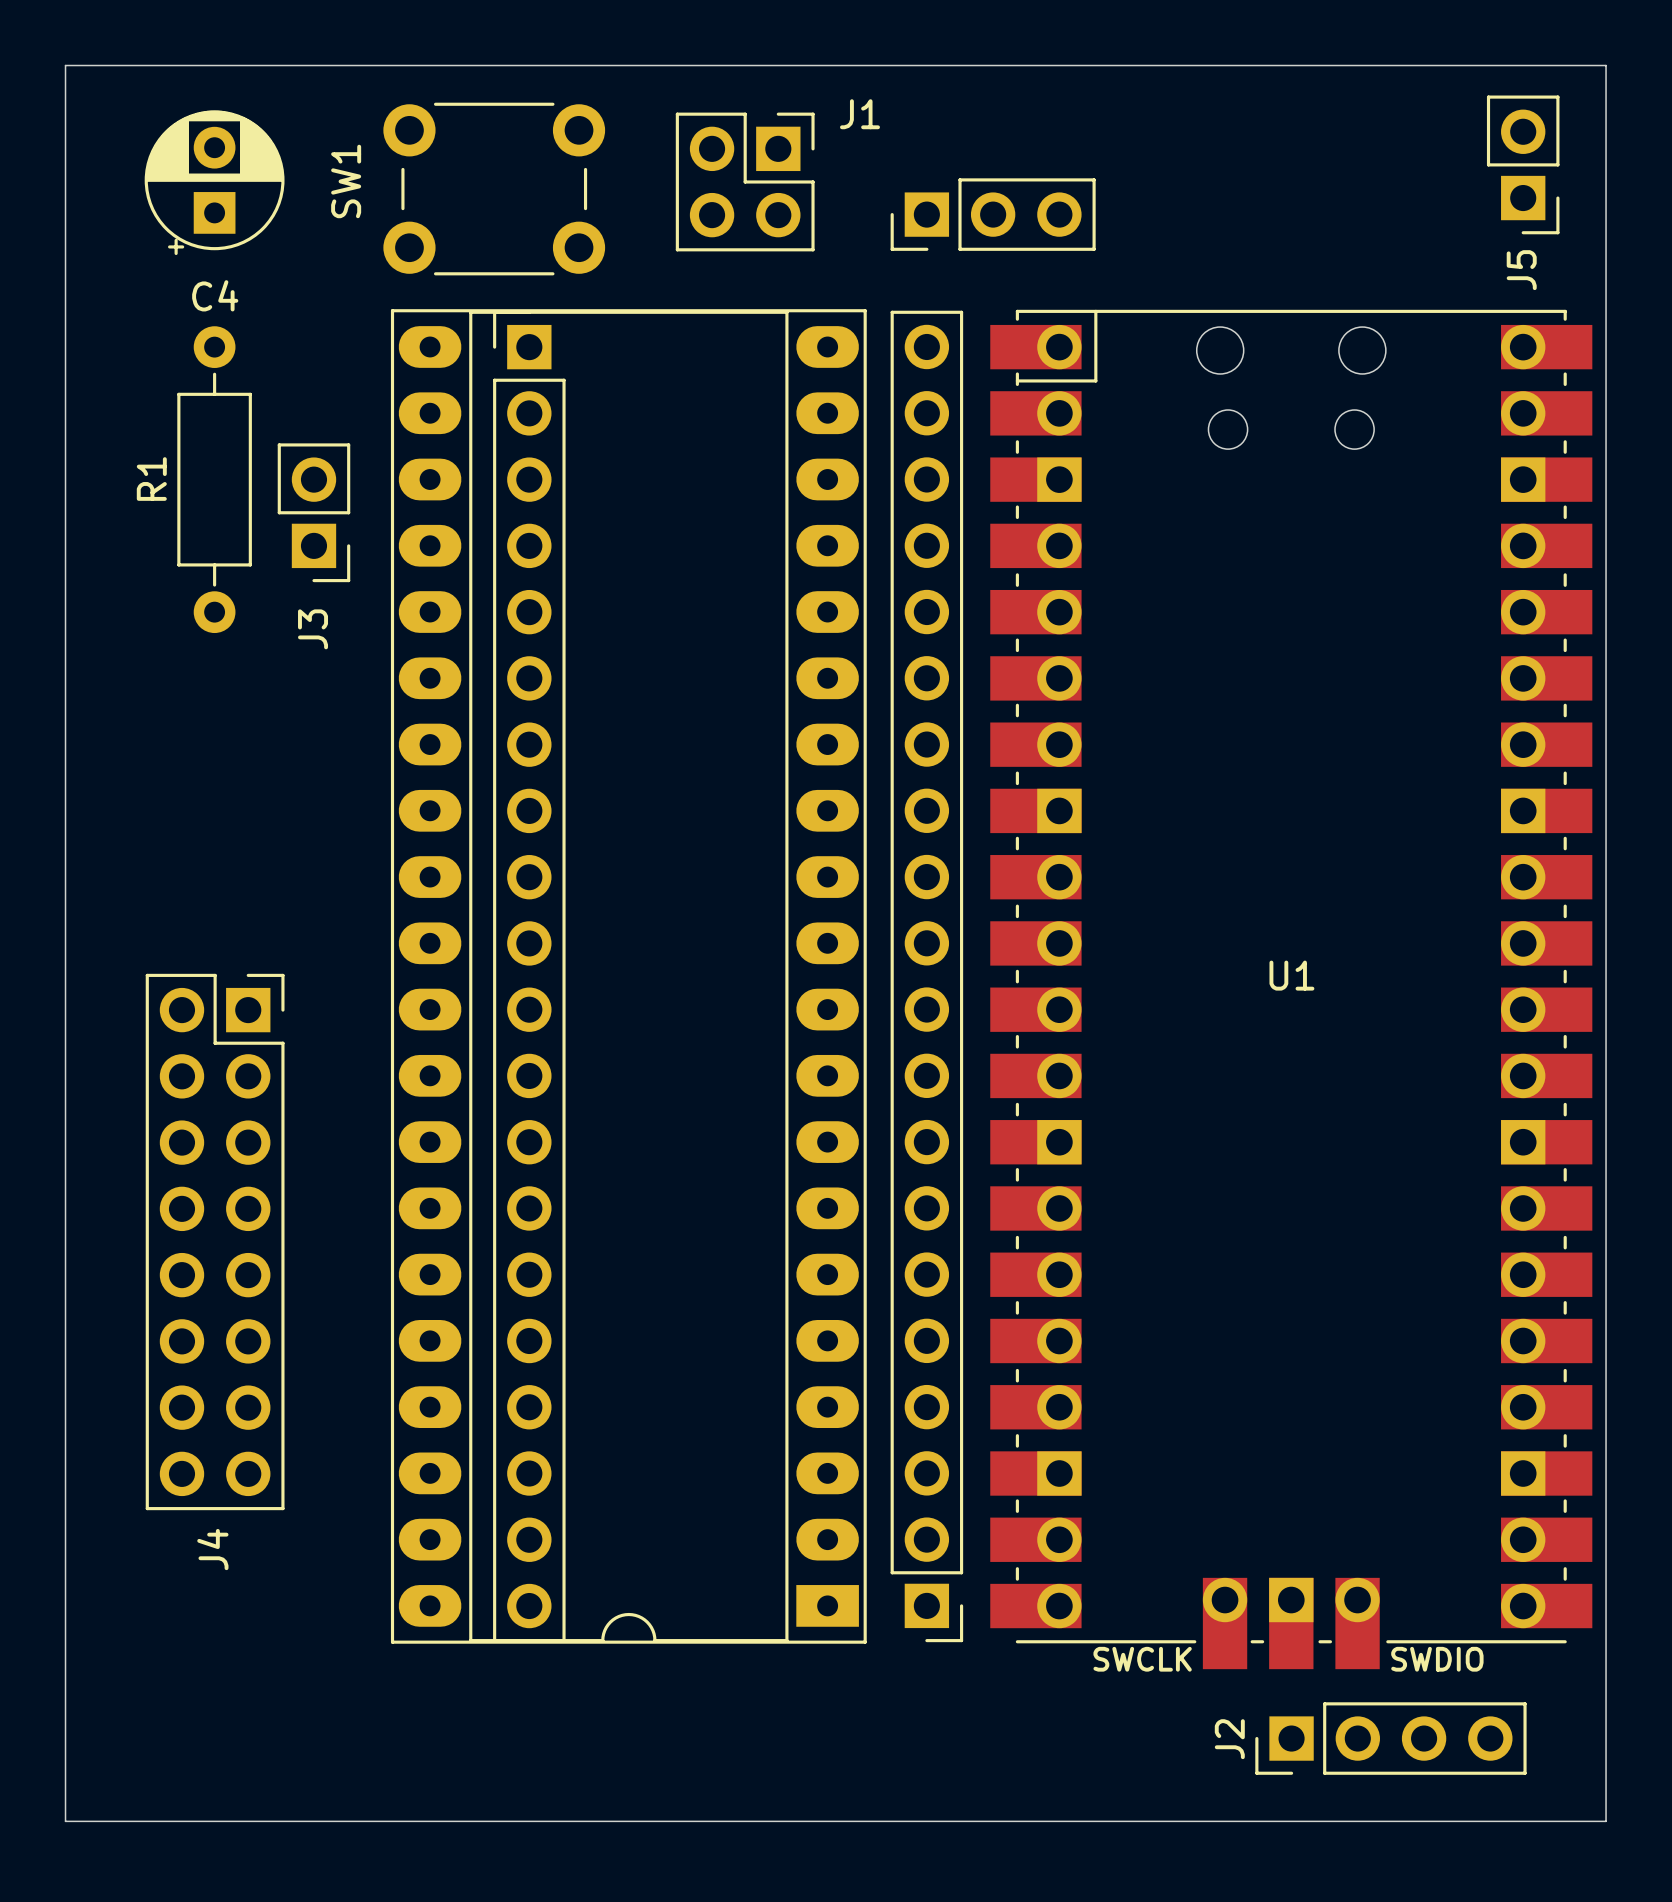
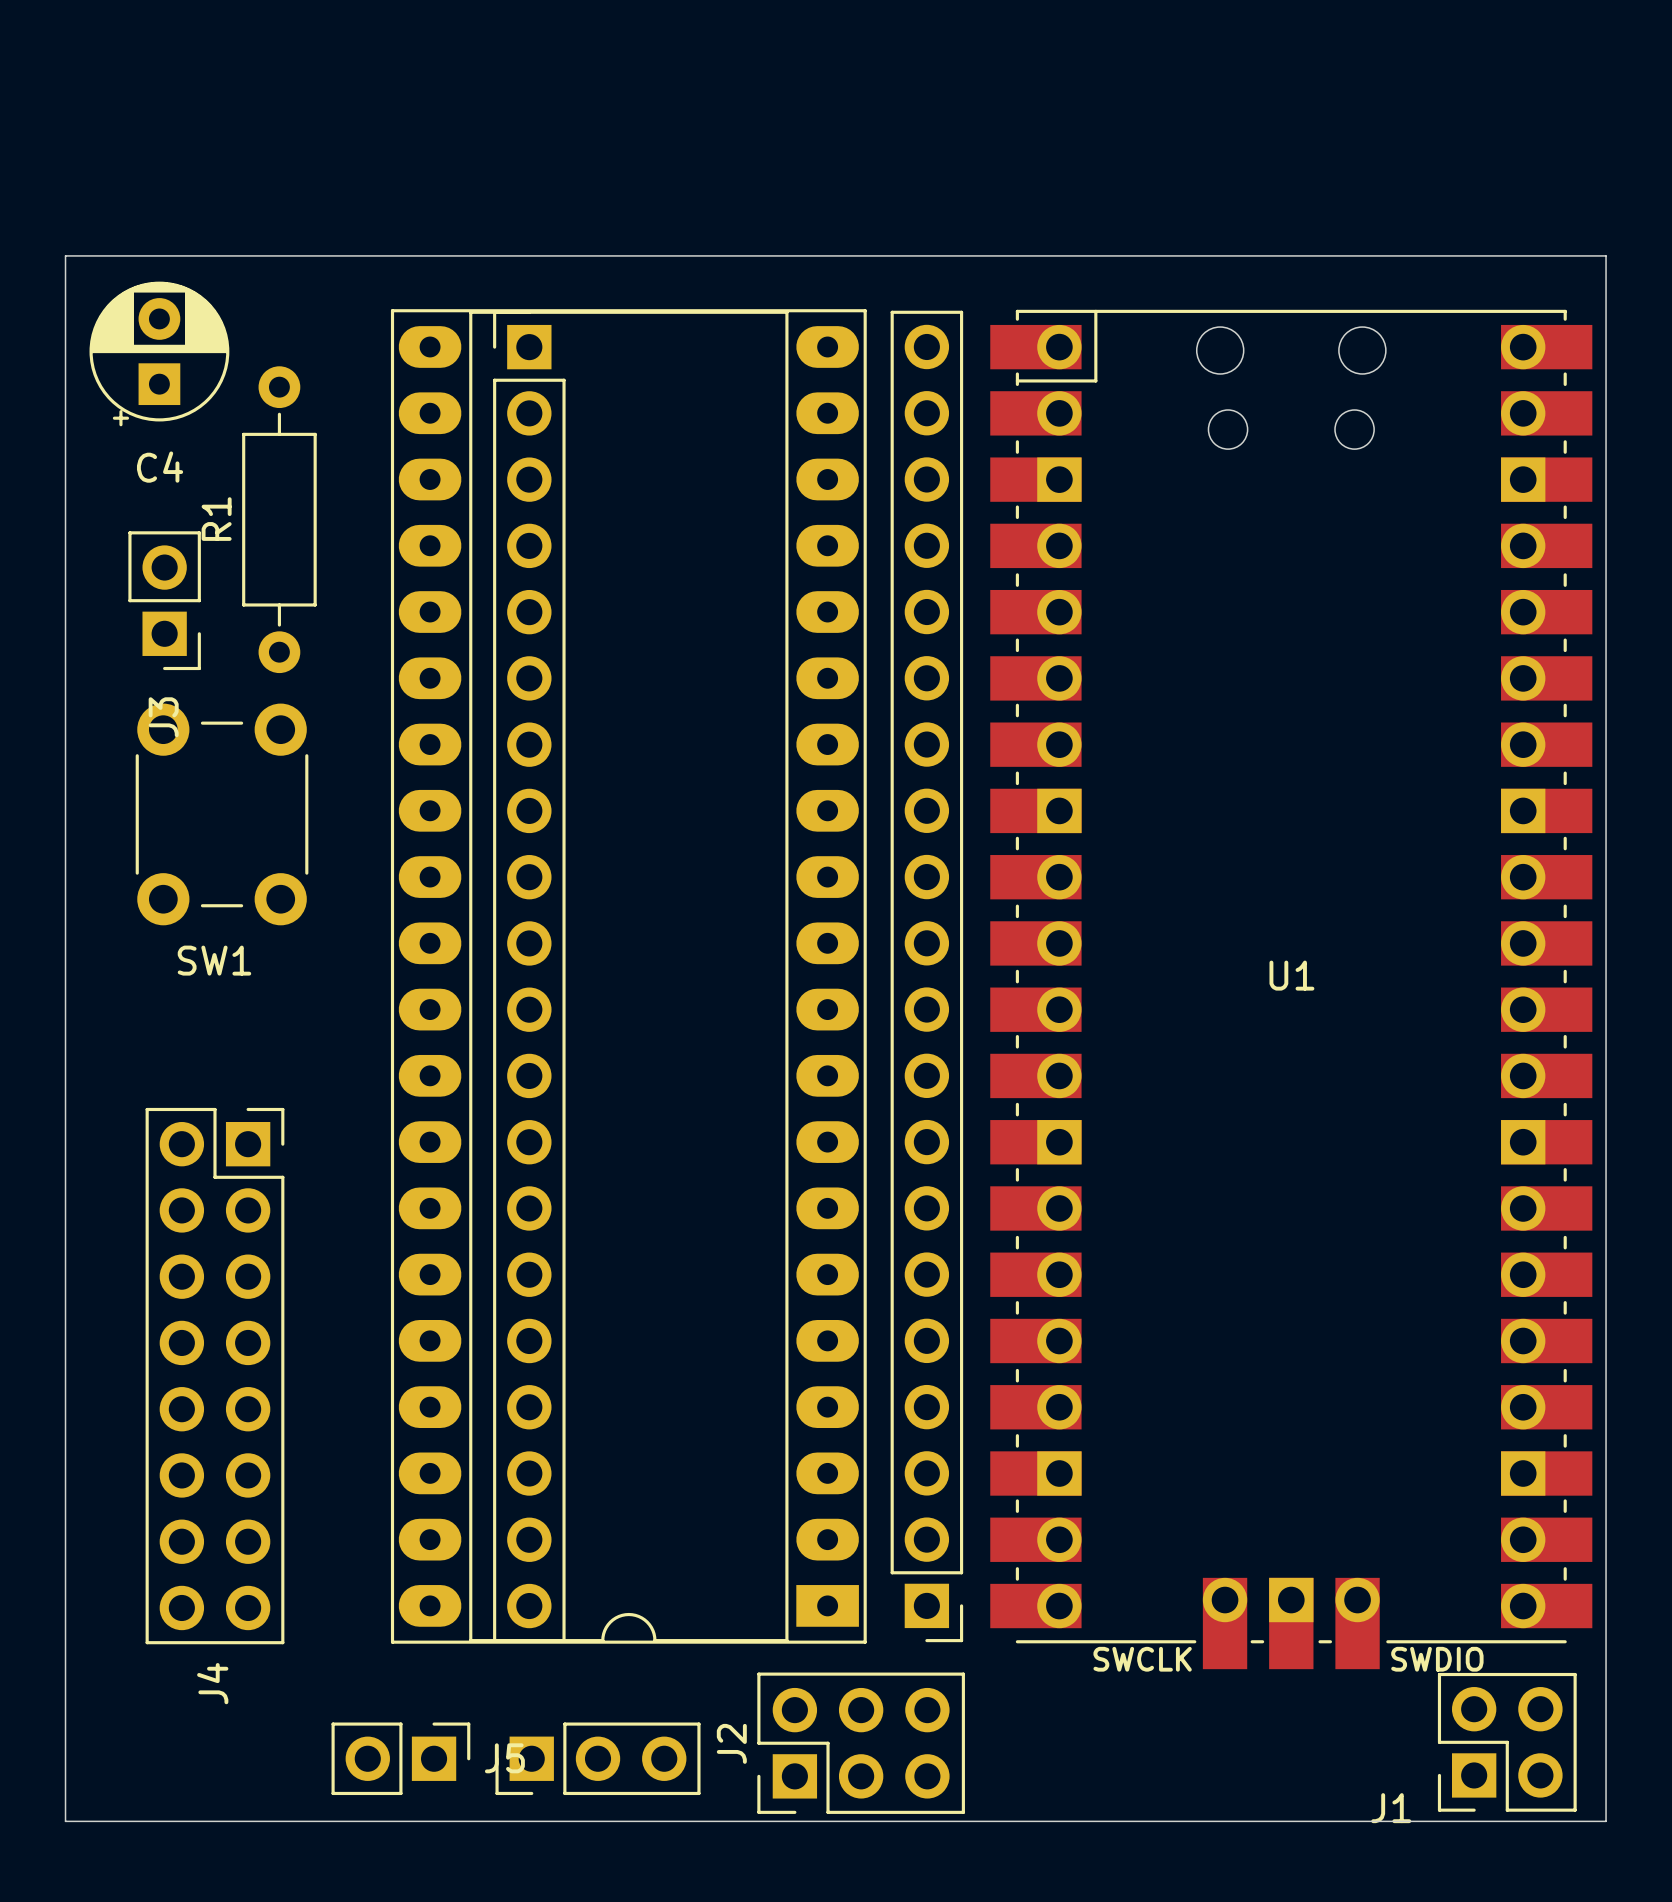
J5 rotation: 0° (1523, 164) -> 90° counterclockwise (400, 1758)
J5 position: (1523, 164) -> (400, 1758)
SW1 name position: SW1 (346, 181) -> SW1 (214, 960)
J1 rotation: 0° (745, 181) -> 180° (1507, 1742)
J1 position: (745, 181) -> (1507, 1742)
C4 position: (214, 182) -> (159, 353)
SW1 rotation: 0° (494, 189) -> 90° clockwise (222, 814)
SW1 position: (494, 189) -> (222, 814)
part: (993, 214) -> none
board edge: (65, 255) (65, 65) (1606, 65) (1606, 255) -> (65, 255) (1606, 255)
R1 position: (214, 479) -> (279, 519)
J3 position: (313, 512) -> (164, 600)
J4 position: (215, 1242) -> (214, 1376)
J2 footprint: [1255, 1702, 1527, 1775] -> [757, 1672, 965, 1814]
part: none -> (598, 1758)

